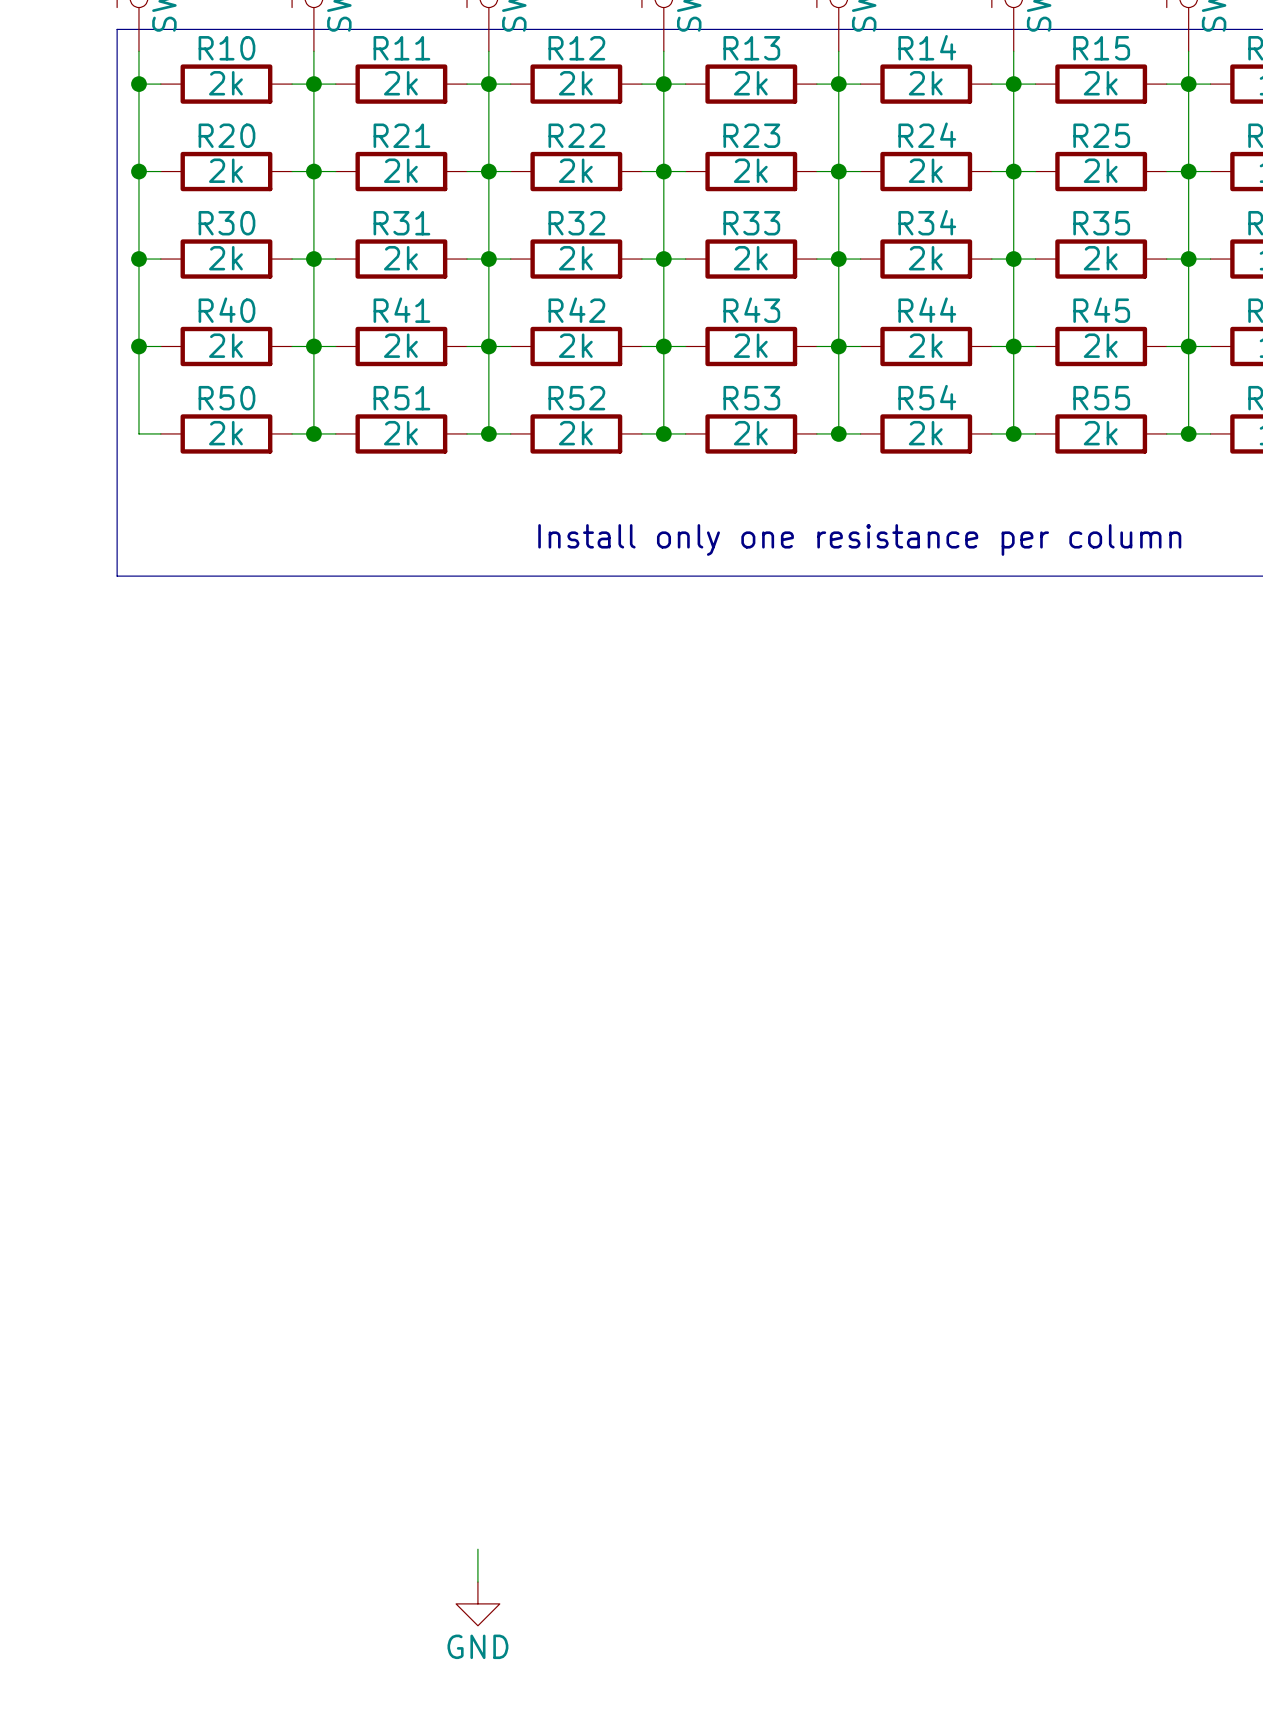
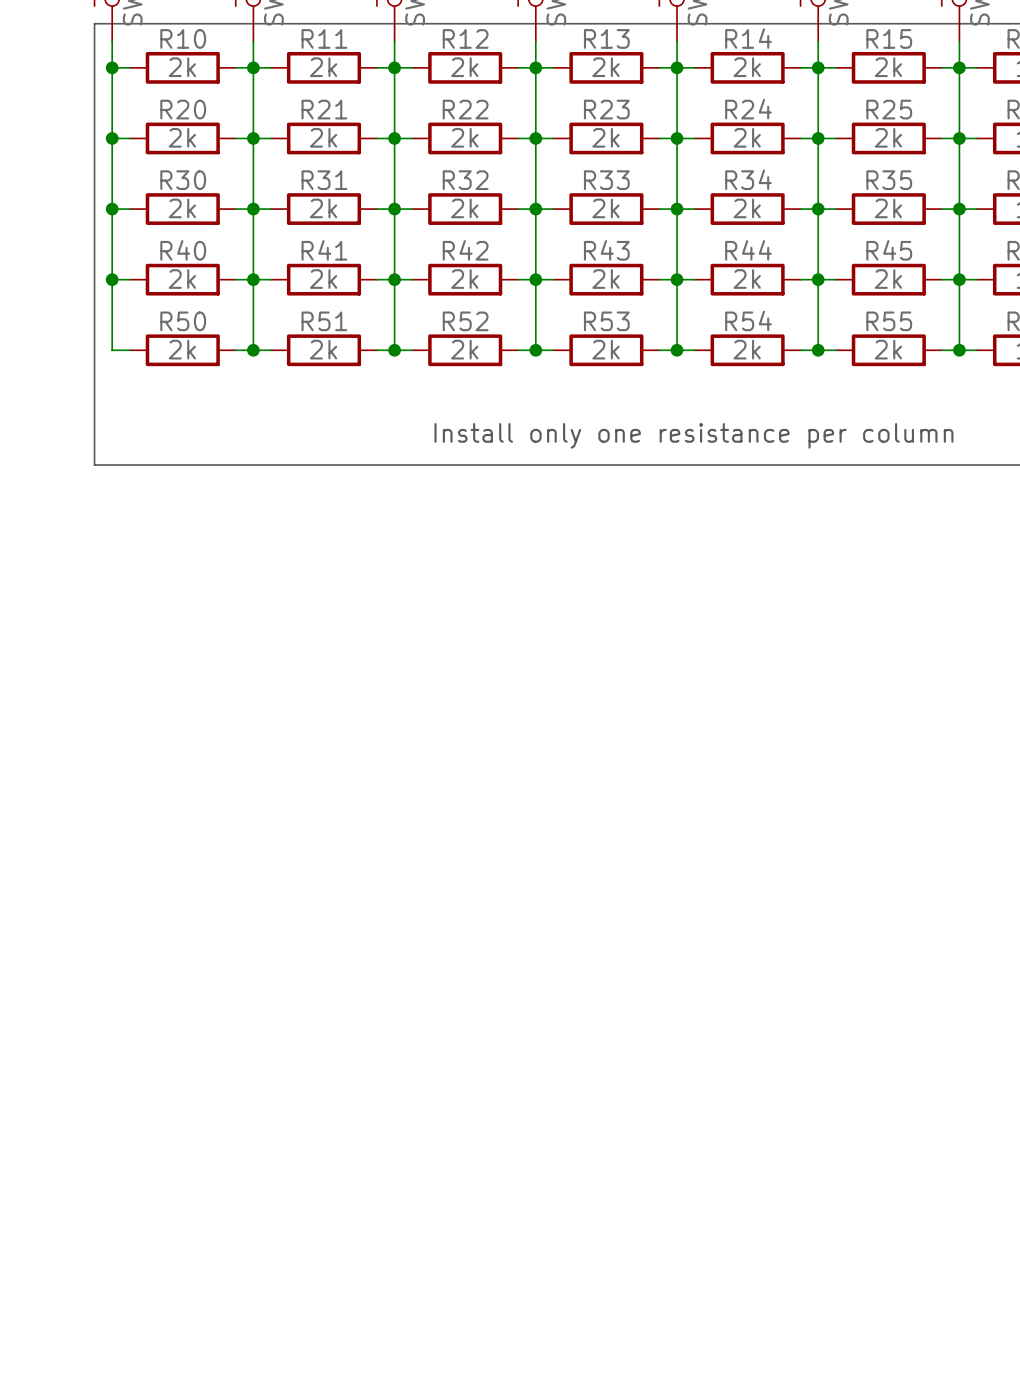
wire: (477, 1549) (477, 1582) -> none
power symbol: GND (477, 1603) -> none

